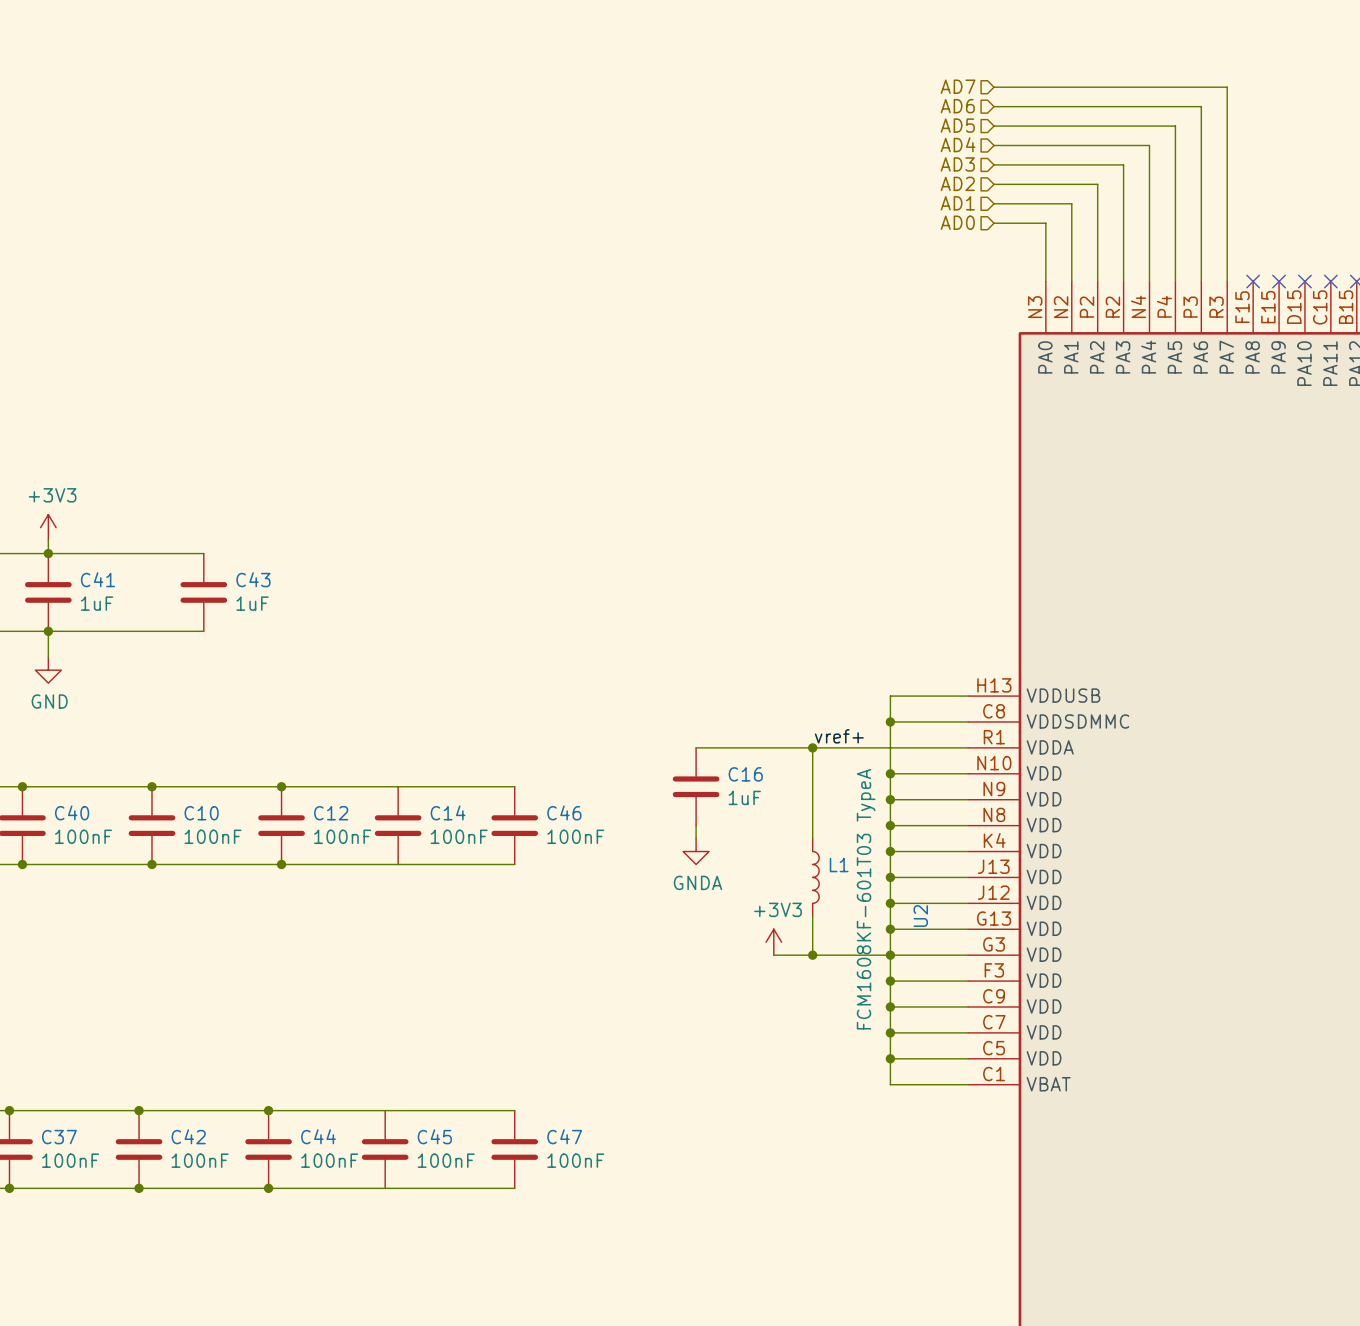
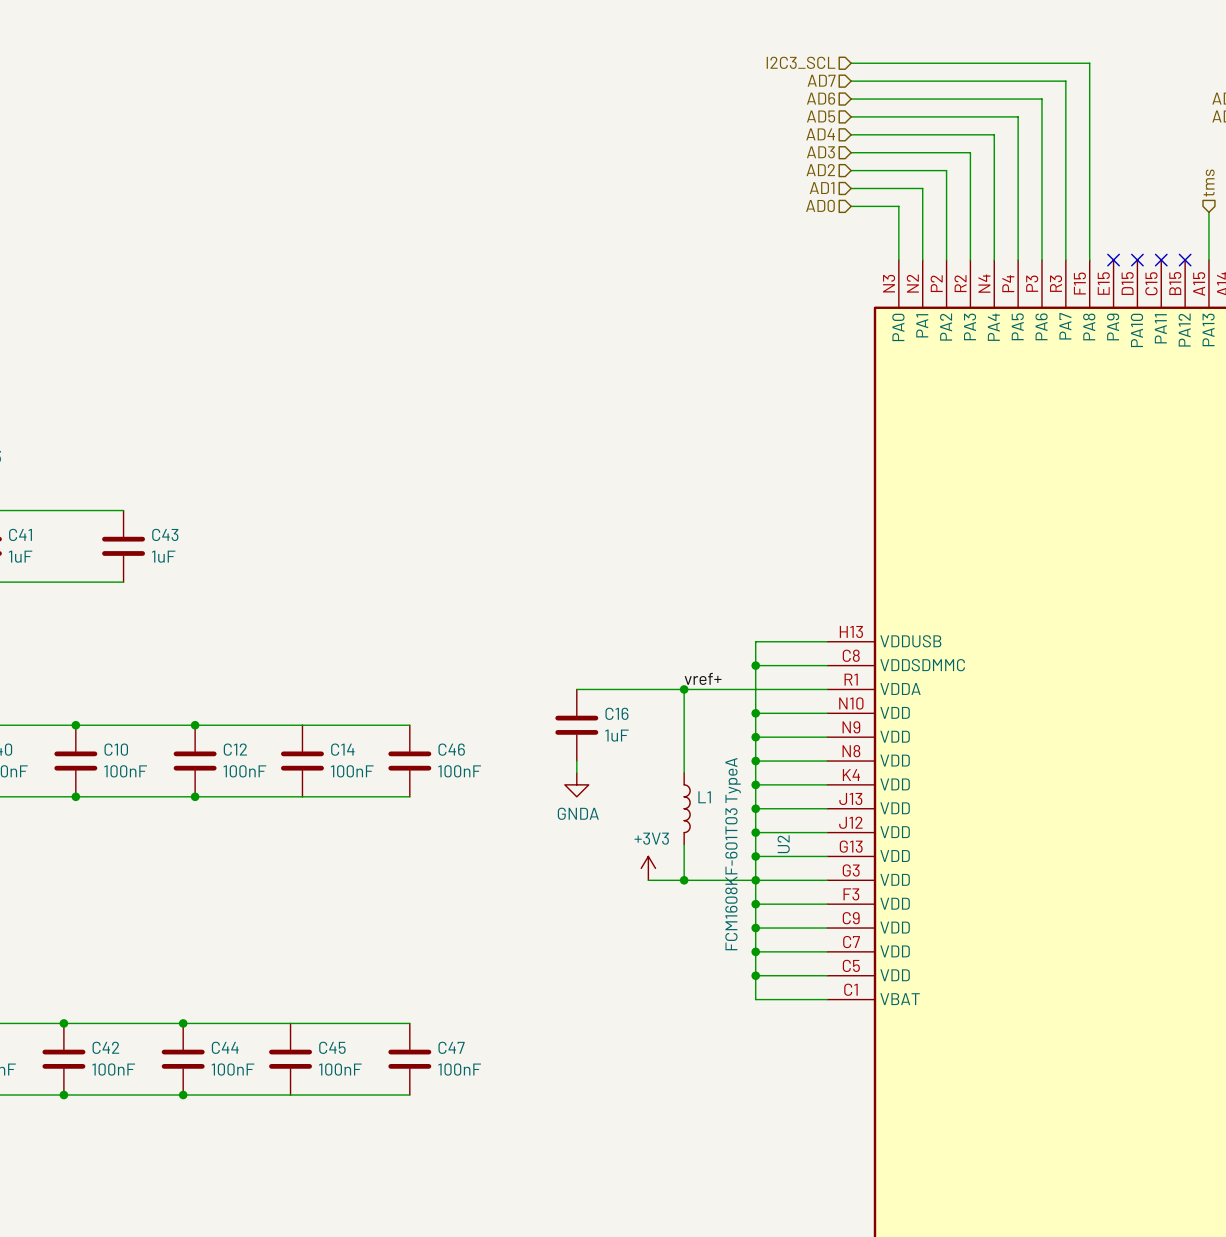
hierarchical label: none -> I2C3_SCL (801, 62)
wire: none -> (851, 63) (1089, 63) (1089, 260)
no-connect mark: (1253, 281) -> none

